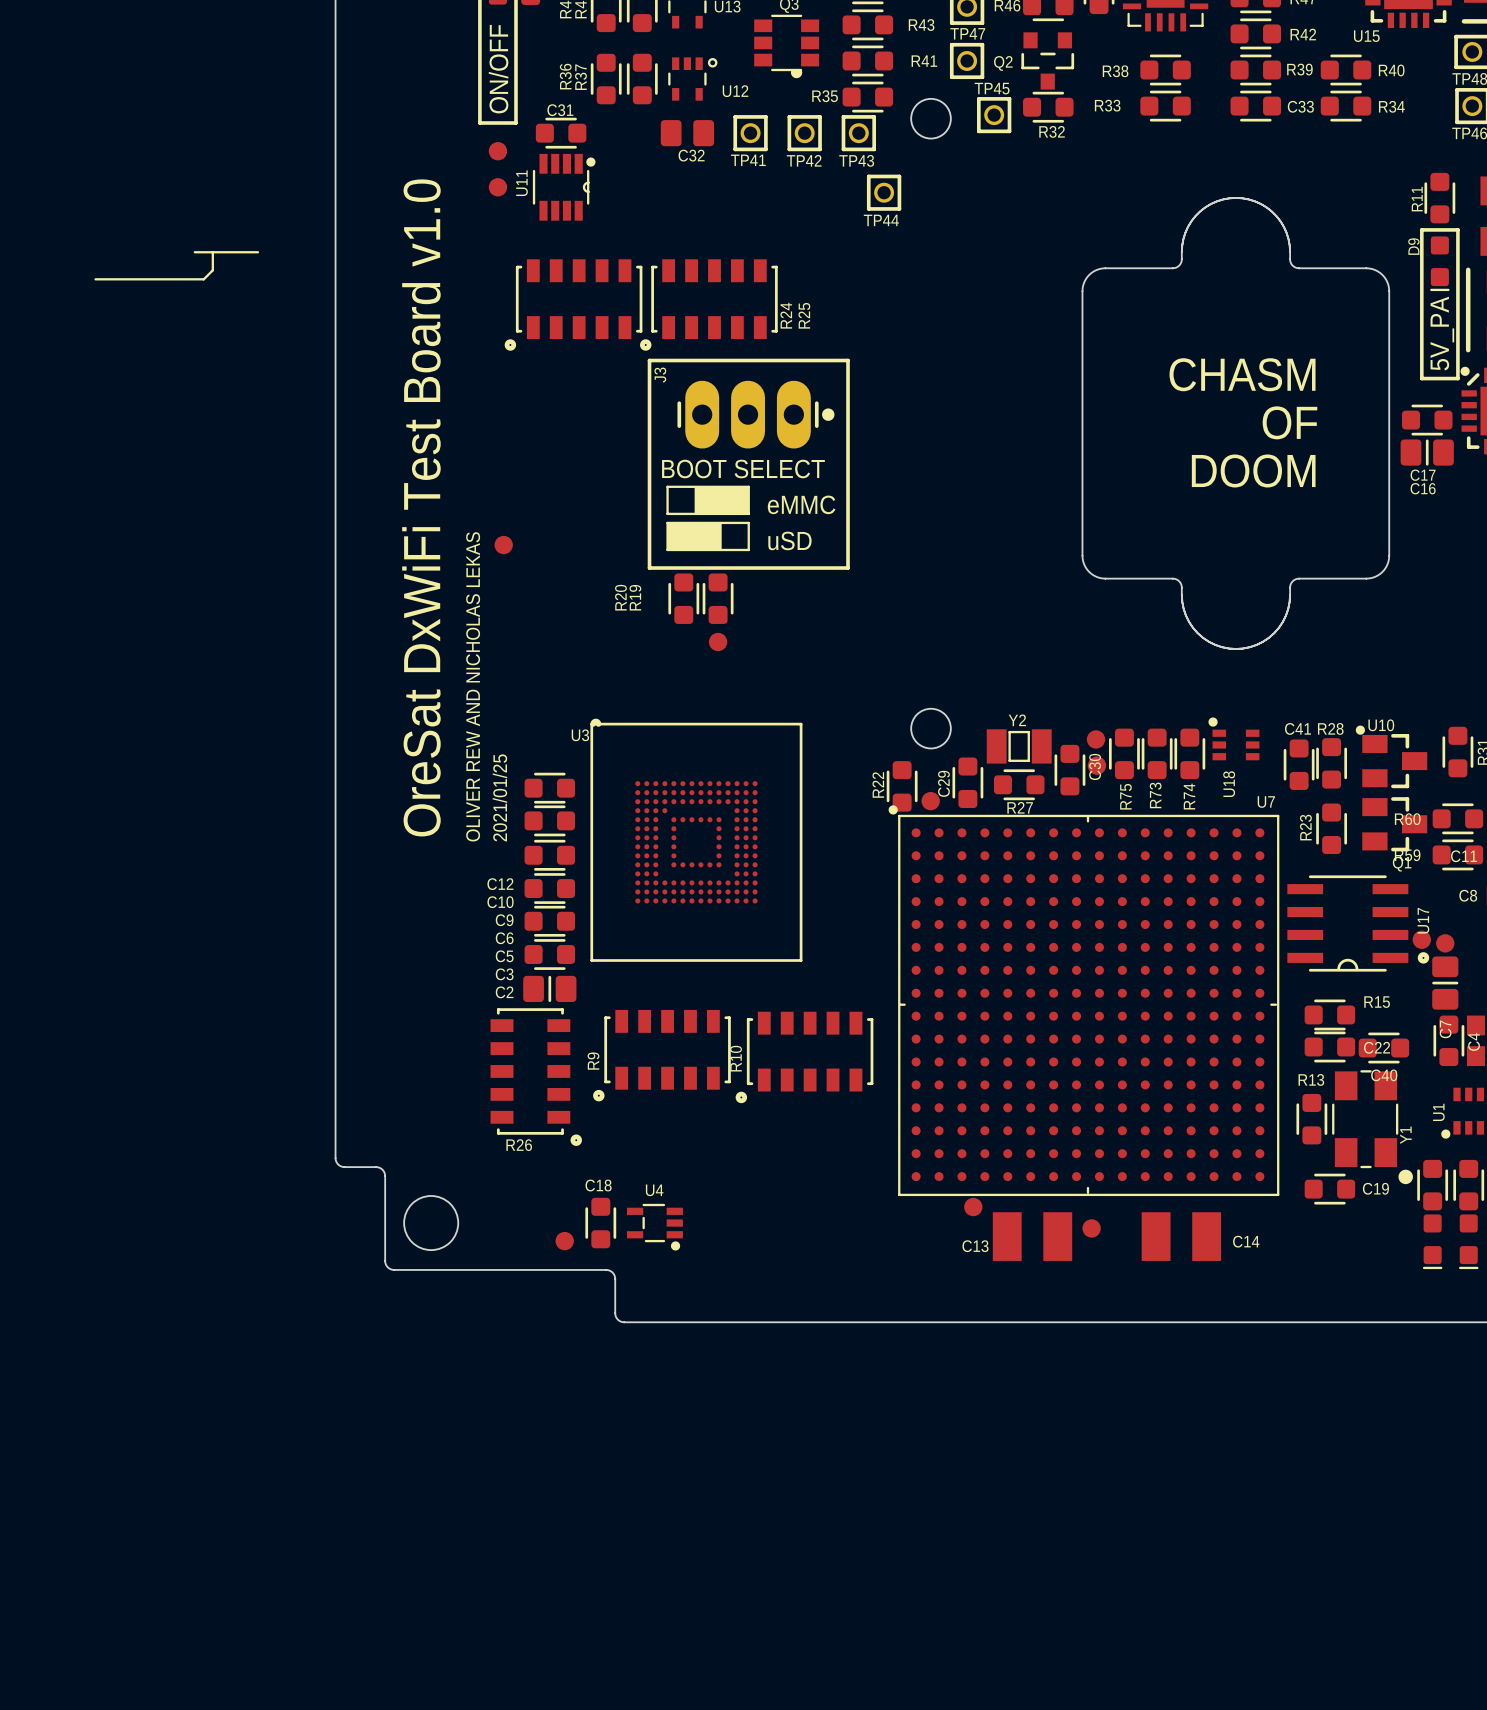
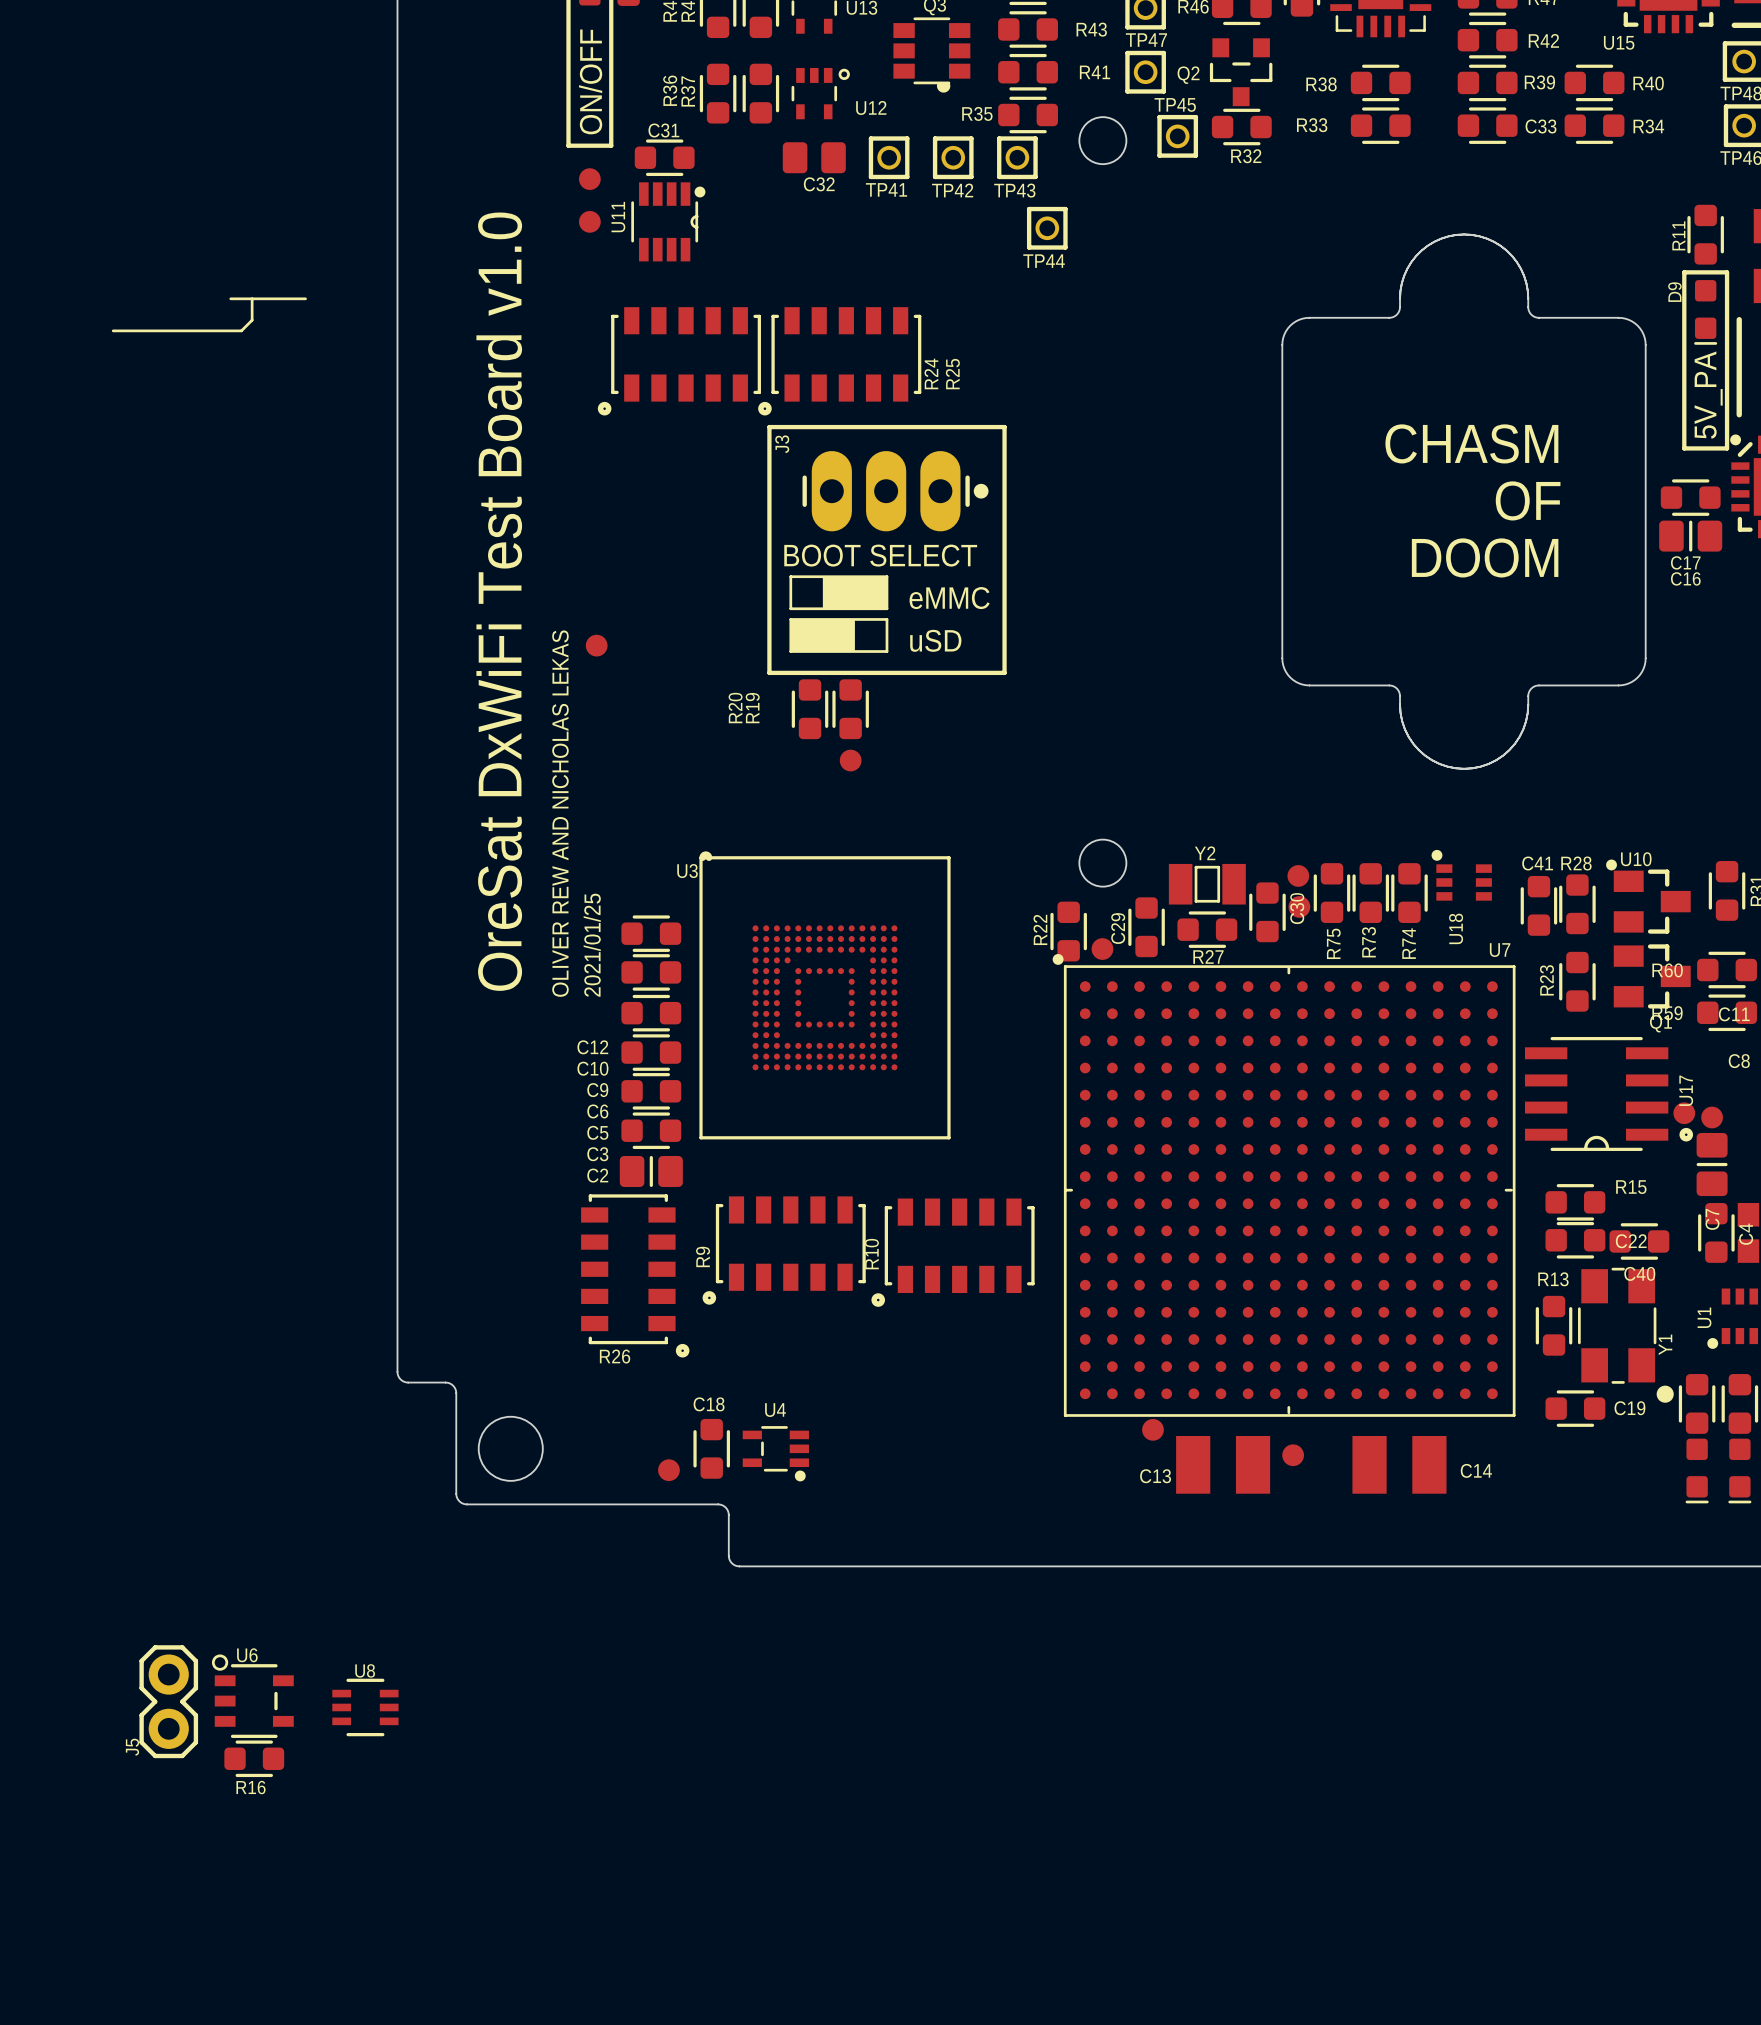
U6: none -> (252, 1696)
J5: none -> (168, 1701)
U8: none -> (365, 1707)
R16: none -> (254, 1758)

